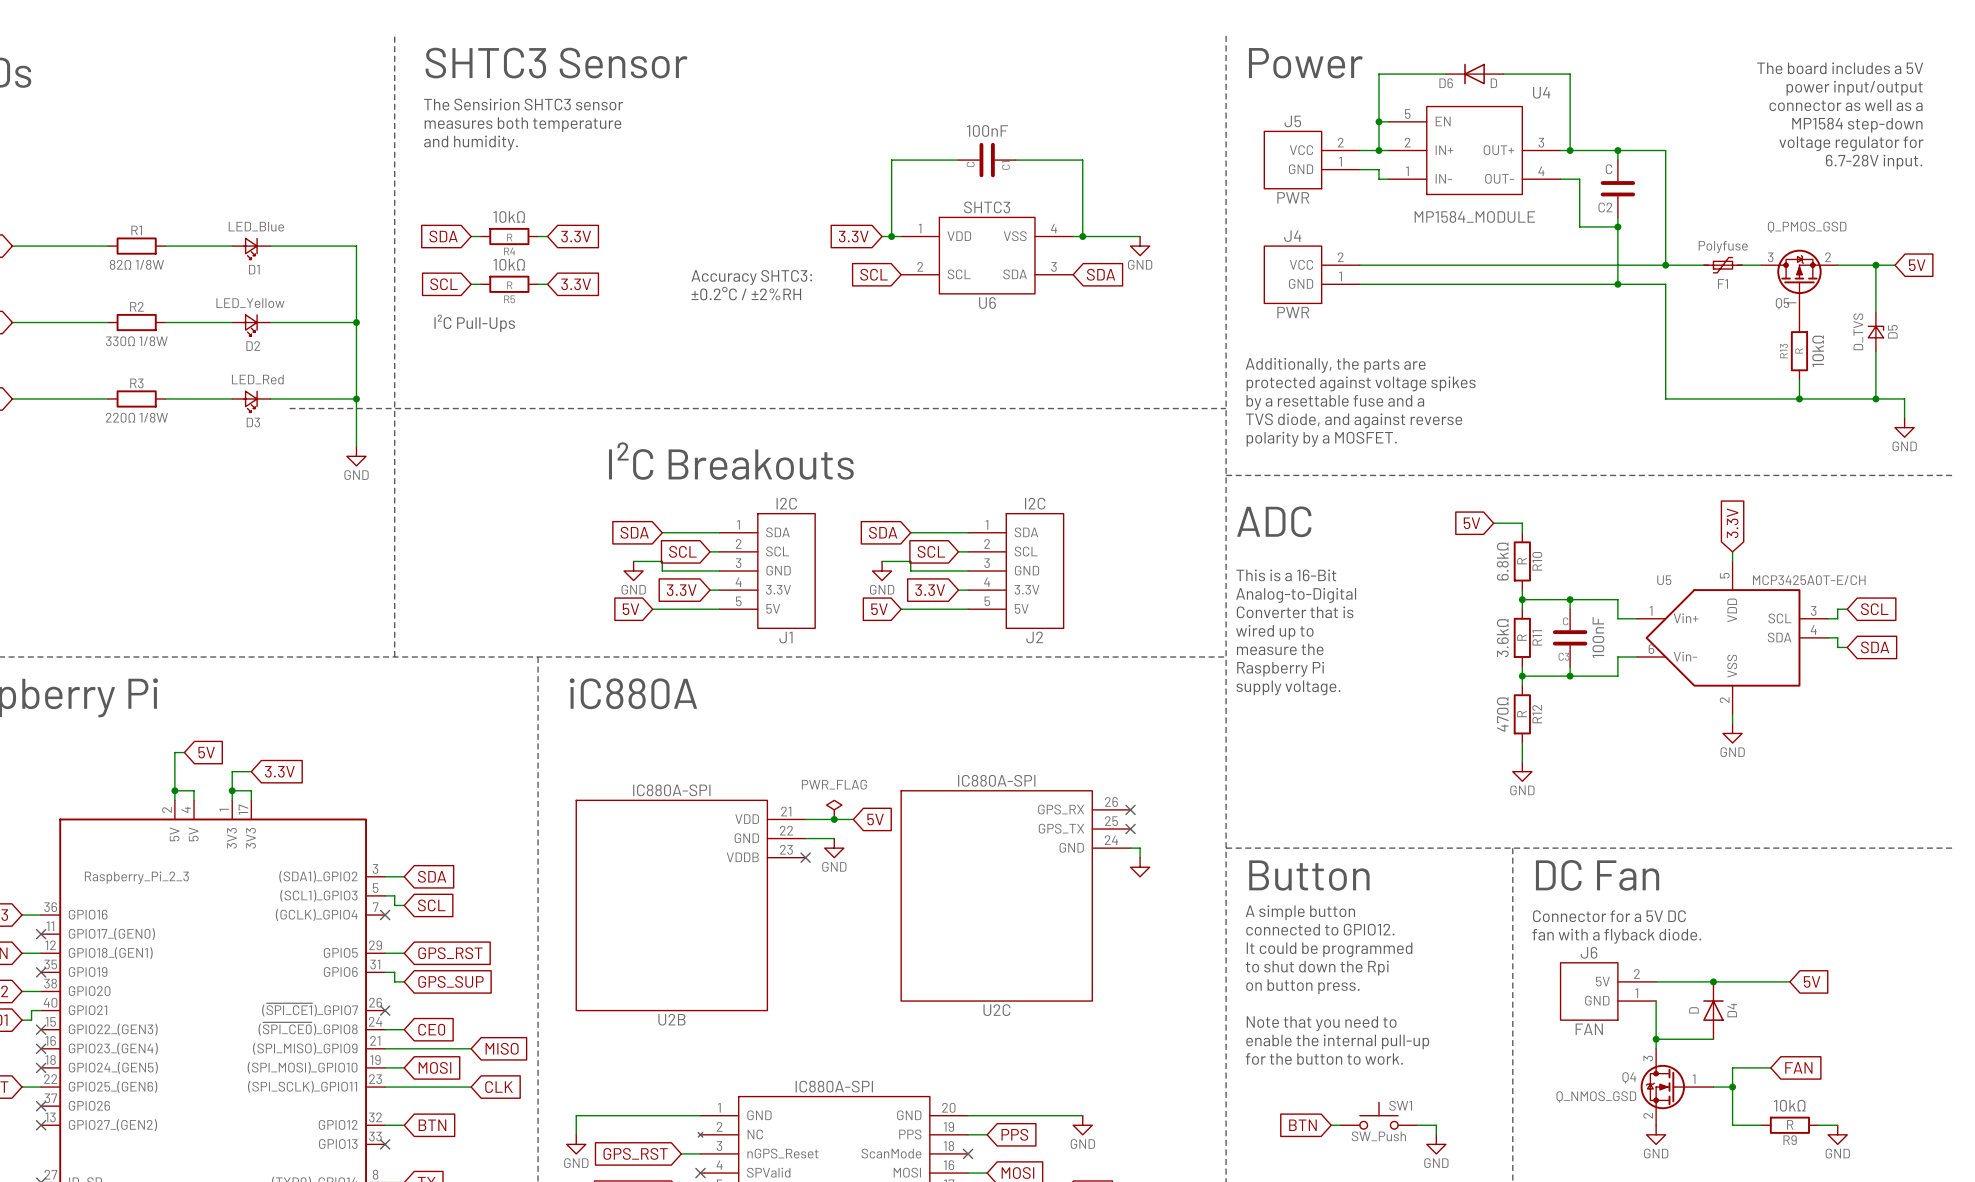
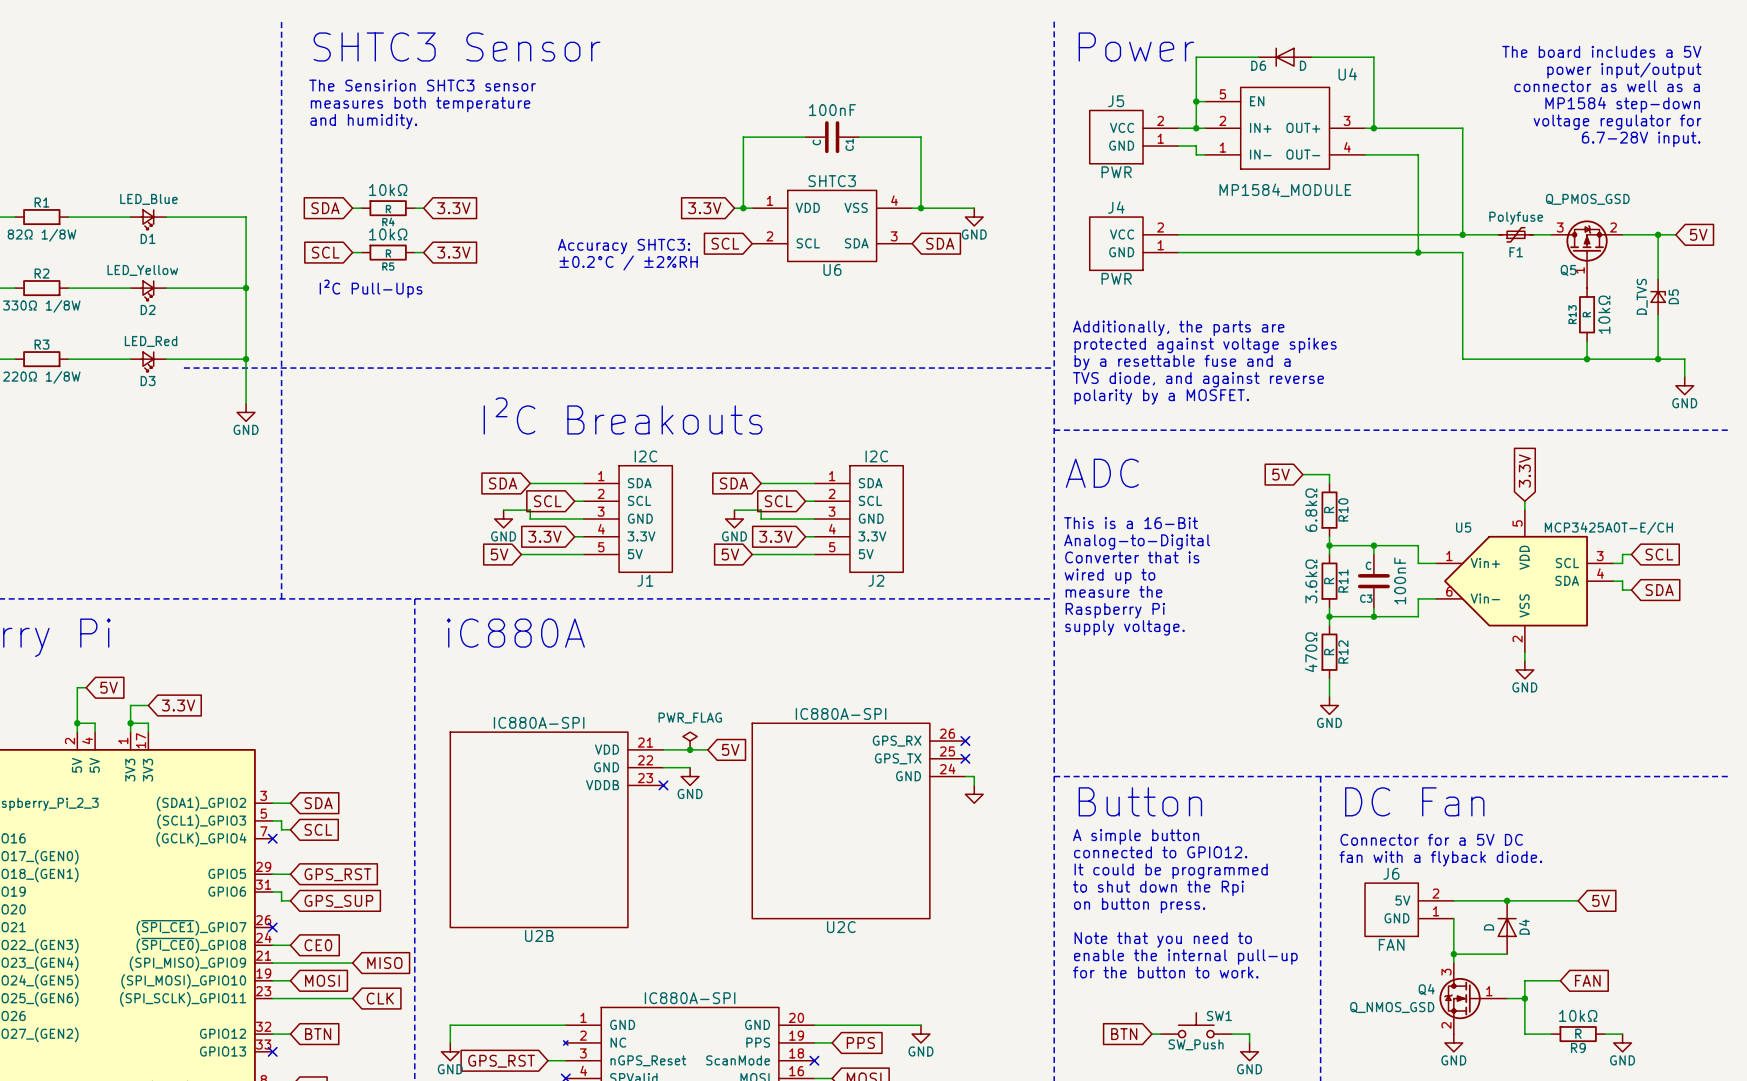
wire: (1617, 150) (1617, 160) -> none
junction: (1617, 150) -> none
wire: (1579, 179) (1579, 226) (1617, 226) -> (1382, 154) (1418, 154) (1418, 190)
C2: C (1617, 188) -> none
junction: (1617, 226) -> none

